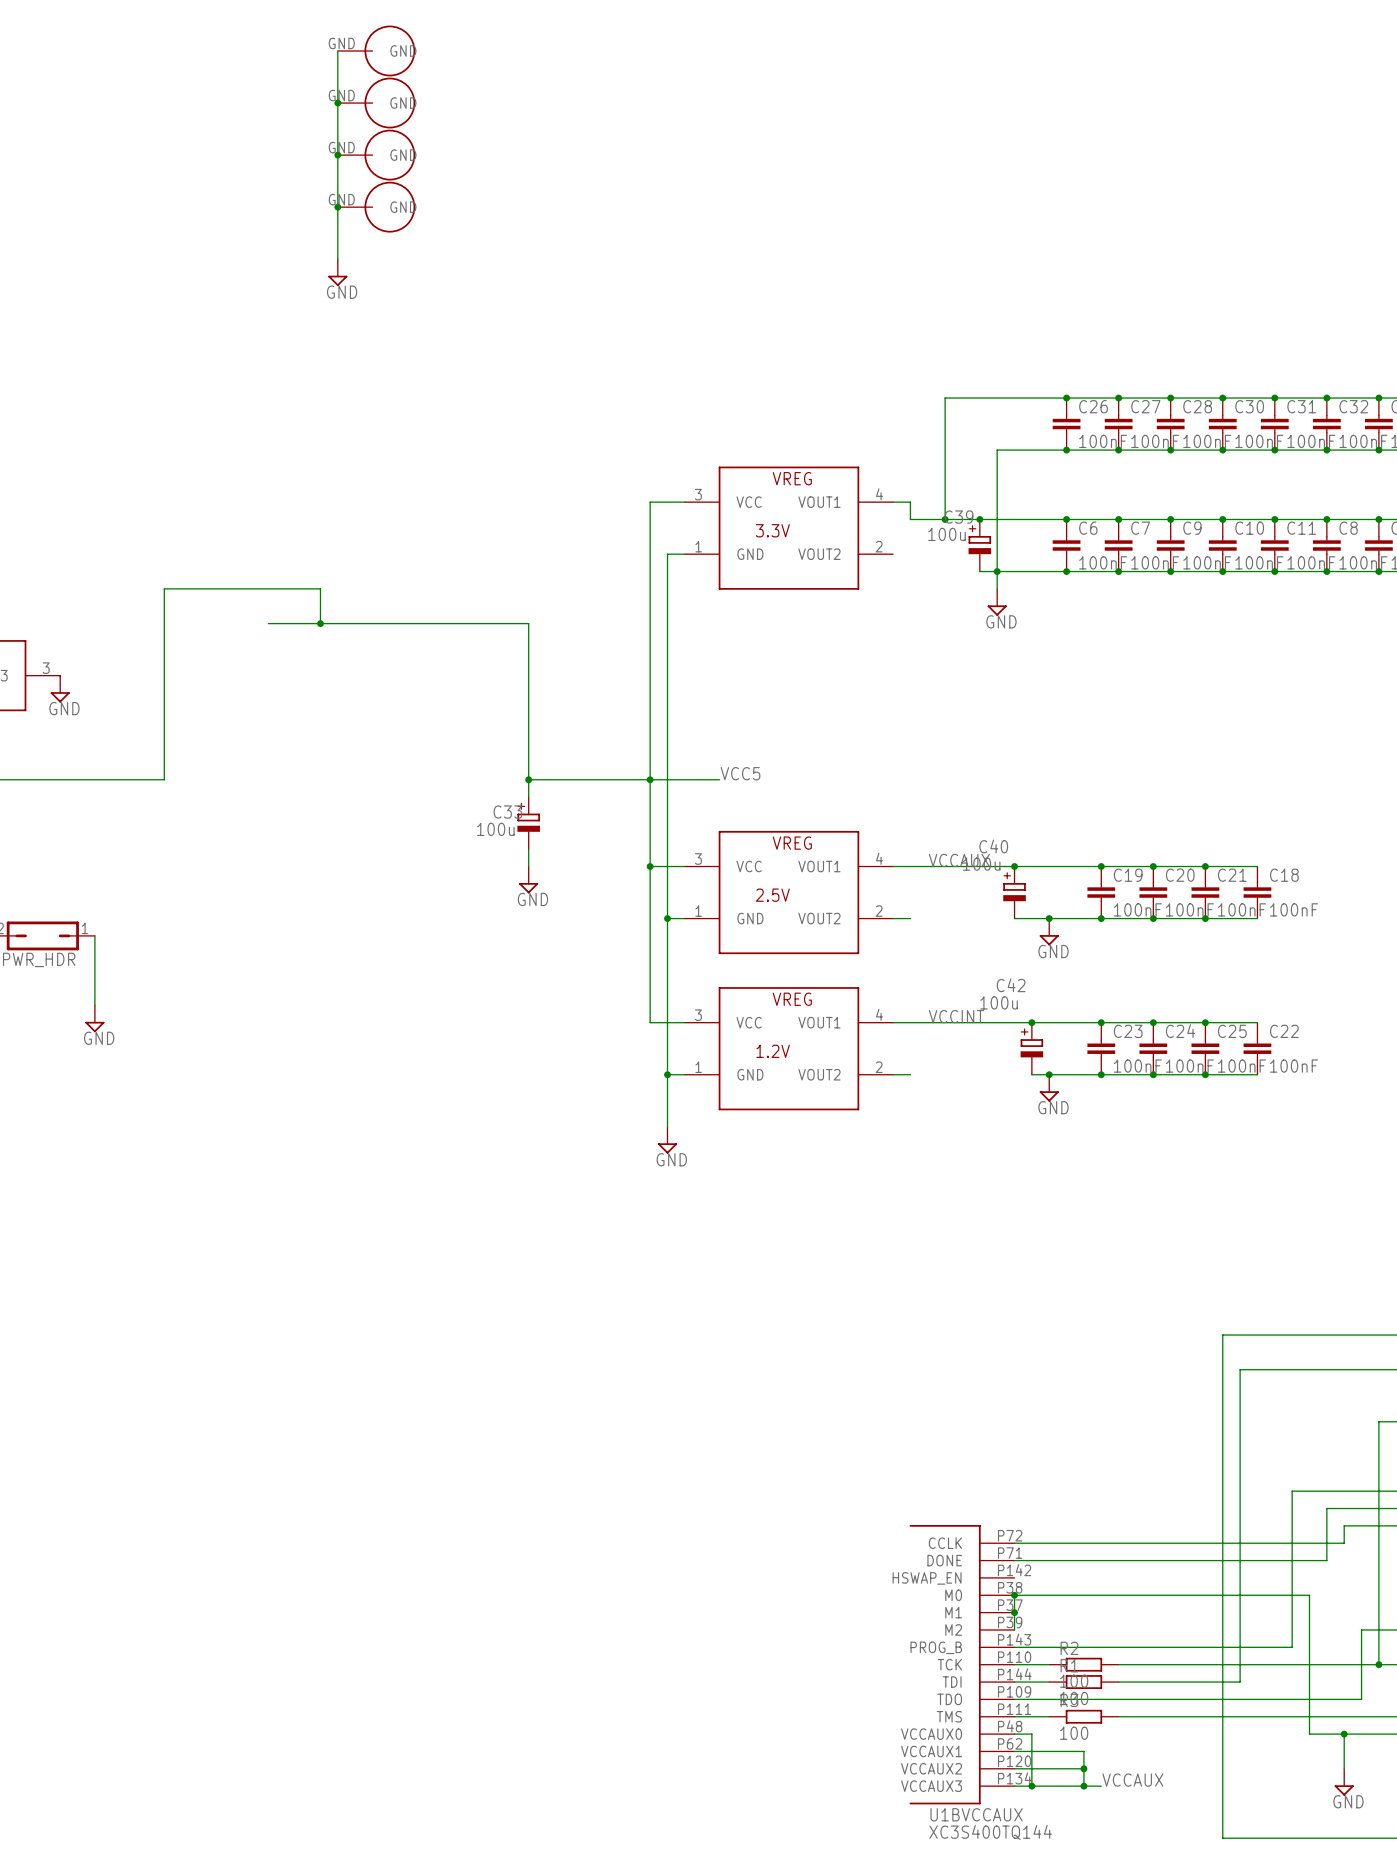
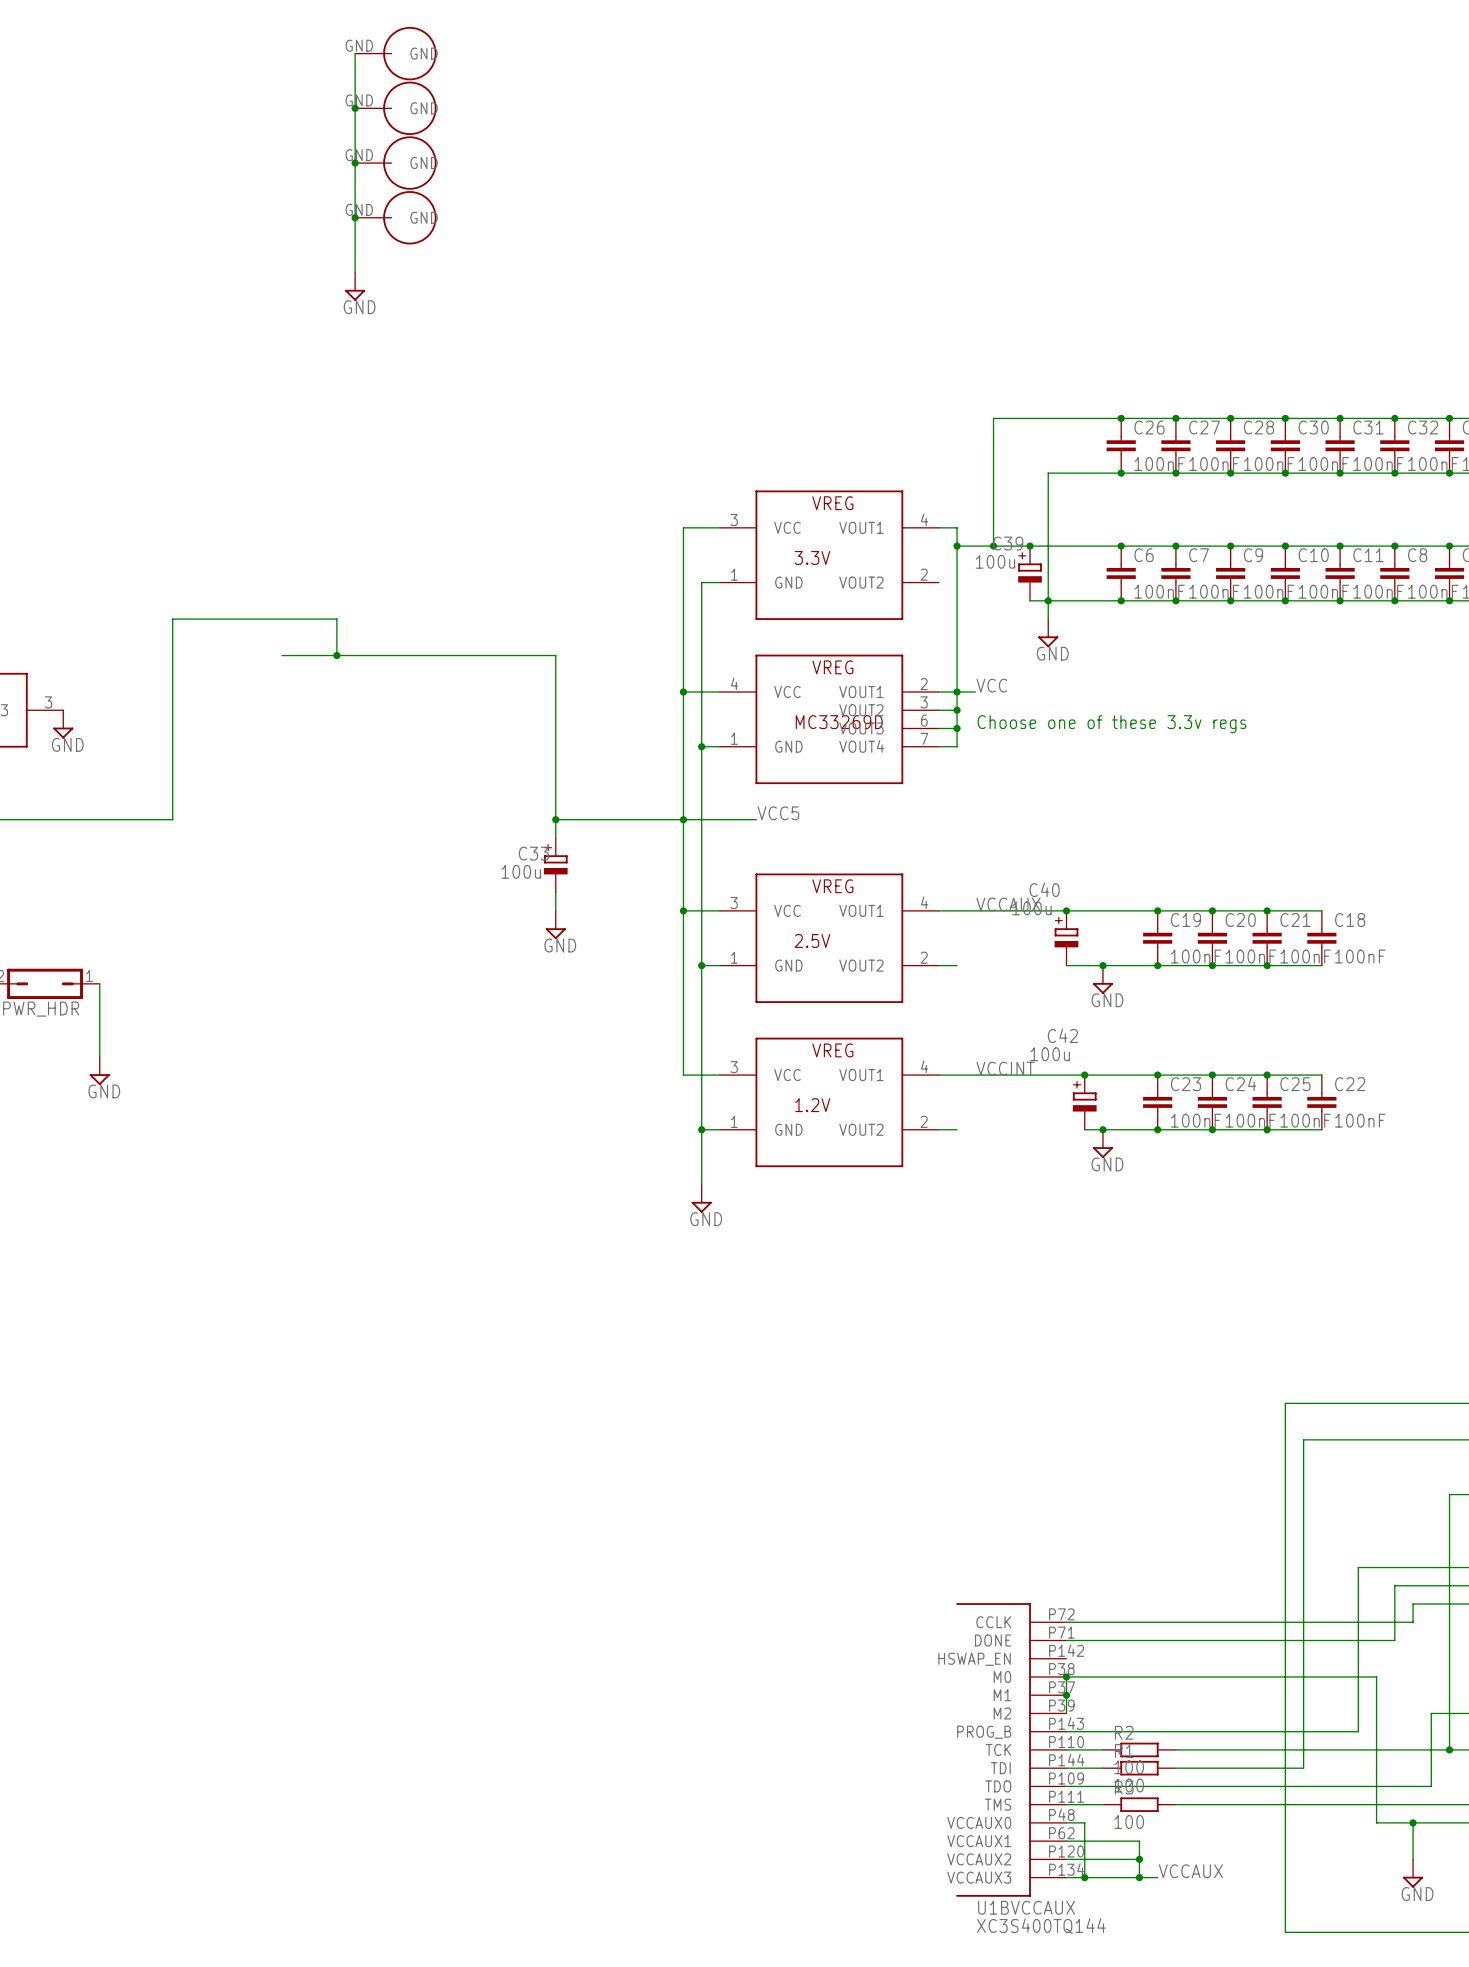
wire: none -> (957, 546) (957, 746) (938, 746)
junction: none -> (957, 546)
label: none -> VCC (991, 685)
wire: none -> (683, 692) (719, 692)
junction: none -> (683, 692)
wire: none -> (938, 692) (975, 692)
junction: none -> (957, 692)
wire: none -> (938, 710) (957, 710)
junction: none -> (957, 710)
part: none -> MC33269D (829, 719)
text: none -> Choose one of these 3.3v regs (1111, 724)
wire: none -> (938, 728) (957, 728)
junction: none -> (957, 728)
wire: none -> (701, 746) (719, 746)
junction: none -> (701, 746)

